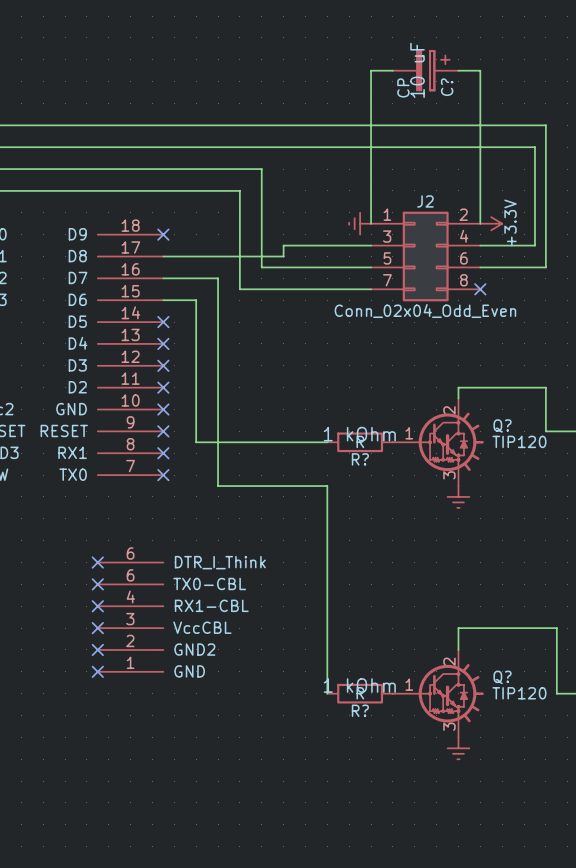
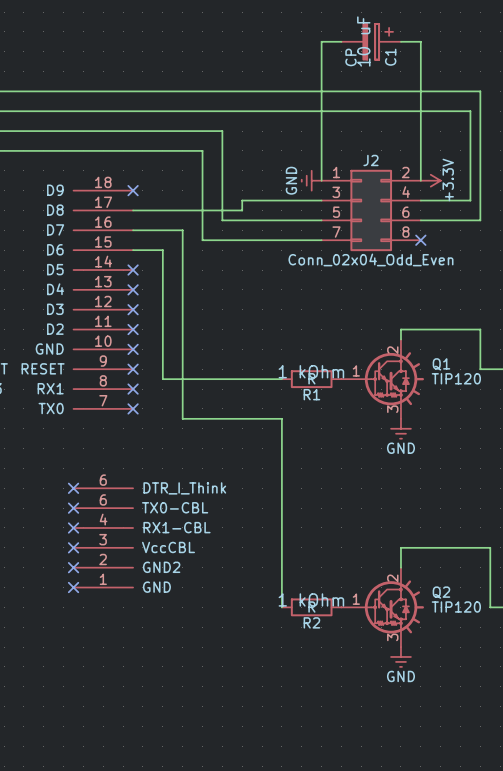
C? name: C? (447, 87) -> C1 (390, 57)
power symbol text: none -> GND (291, 180)
Q? name: Q? (502, 426) -> Q1 (441, 364)
R? name: R? (360, 459) -> R1 (311, 394)
power symbol text: none -> GND (400, 448)
Q? name: Q? (502, 677) -> Q2 (441, 592)
R? name: R? (360, 710) -> R2 (311, 622)
power symbol text: none -> GND (400, 676)

